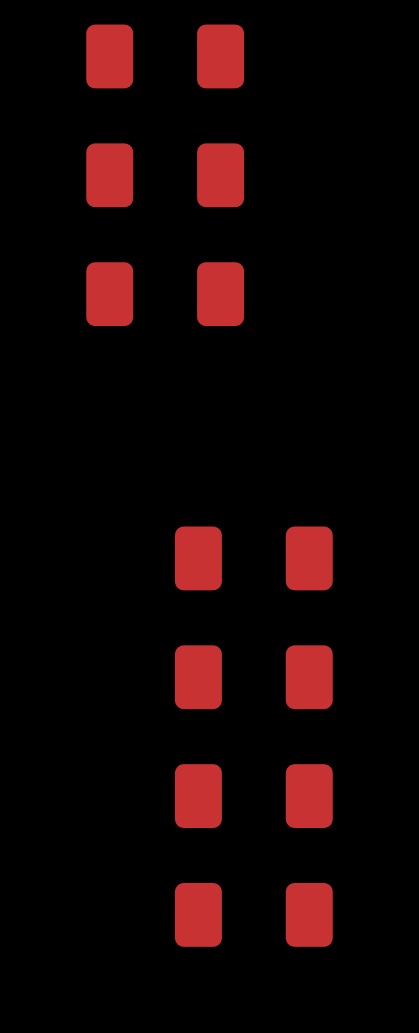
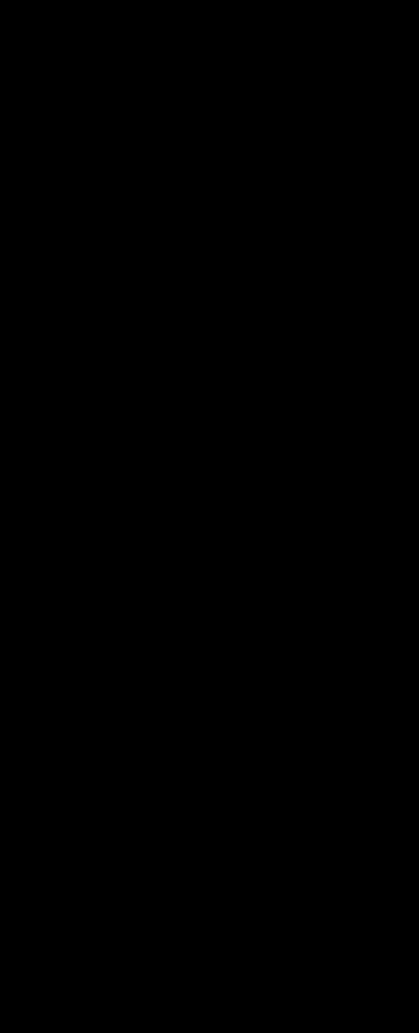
part: (165, 56) -> none
part: (165, 175) -> none
part: (165, 294) -> none
part: (253, 558) -> none
part: (253, 677) -> none
part: (253, 796) -> none
part: (253, 914) -> none

